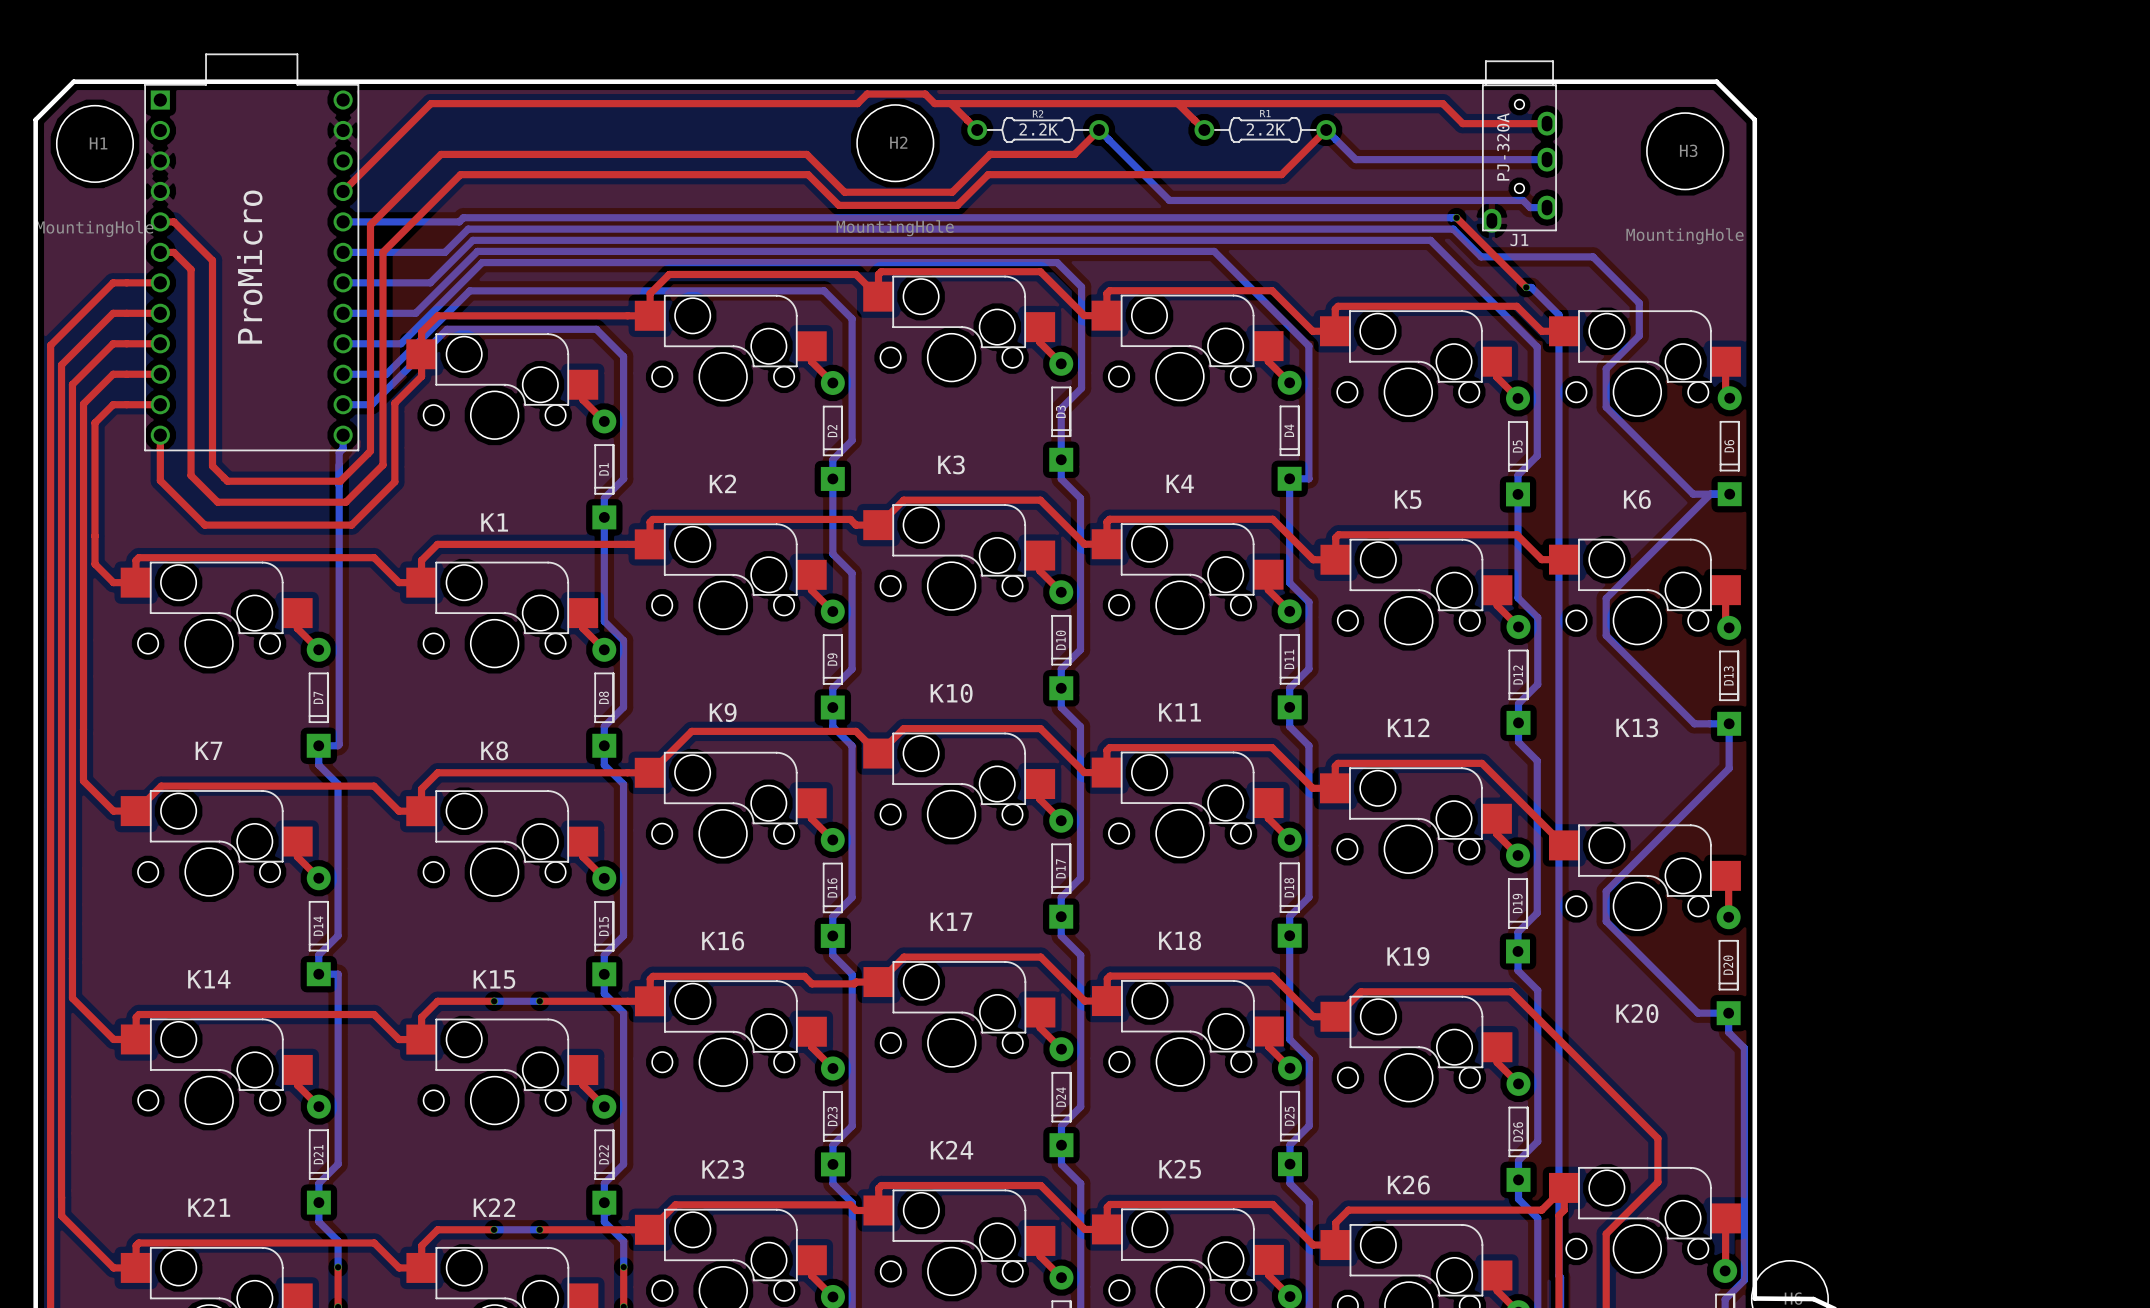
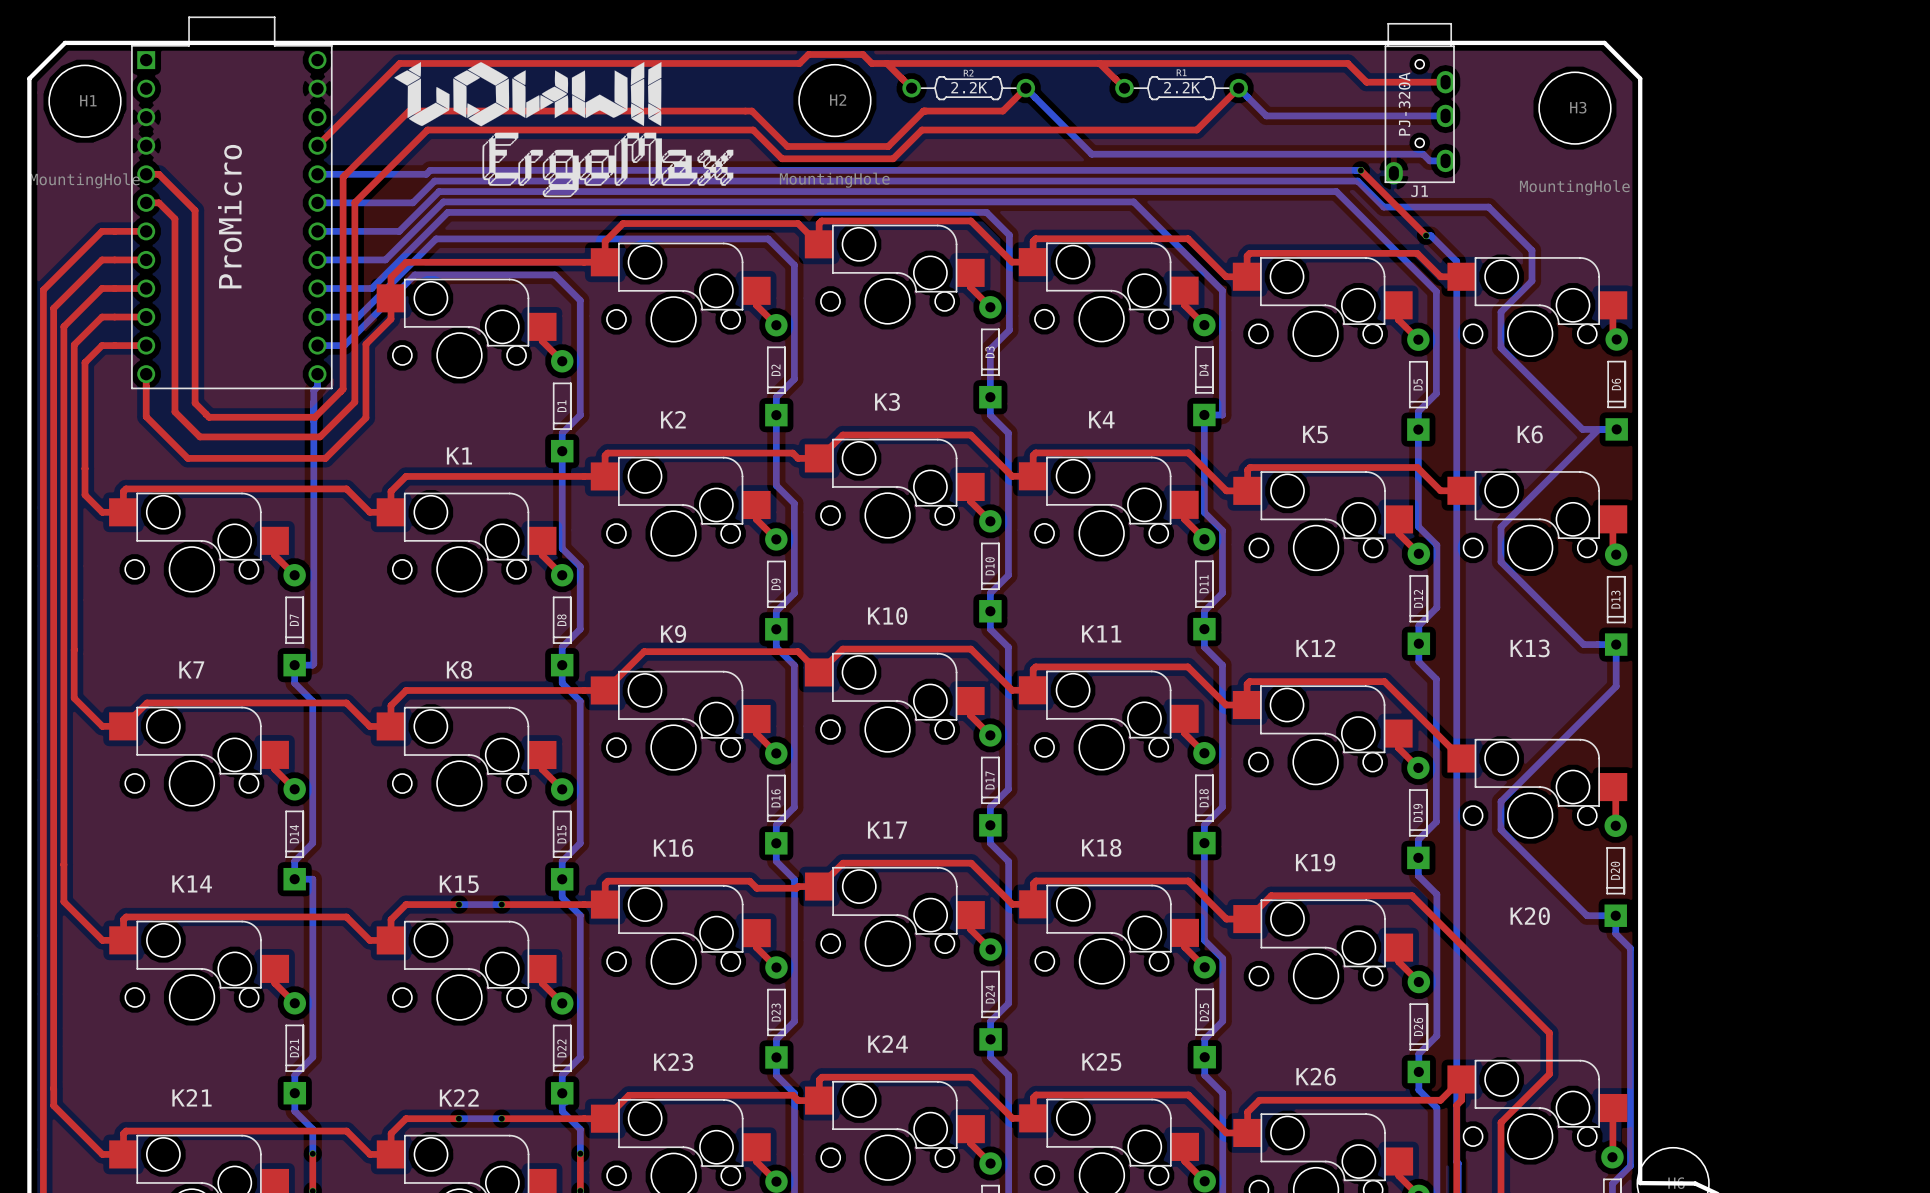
drawing: none -> [394, 61, 734, 198]

